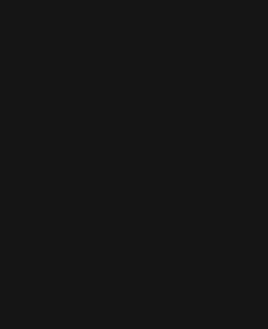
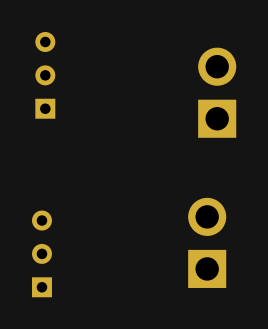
part: none -> (45, 75)
part: none -> (217, 92)
part: none -> (207, 242)
part: none -> (41, 253)

